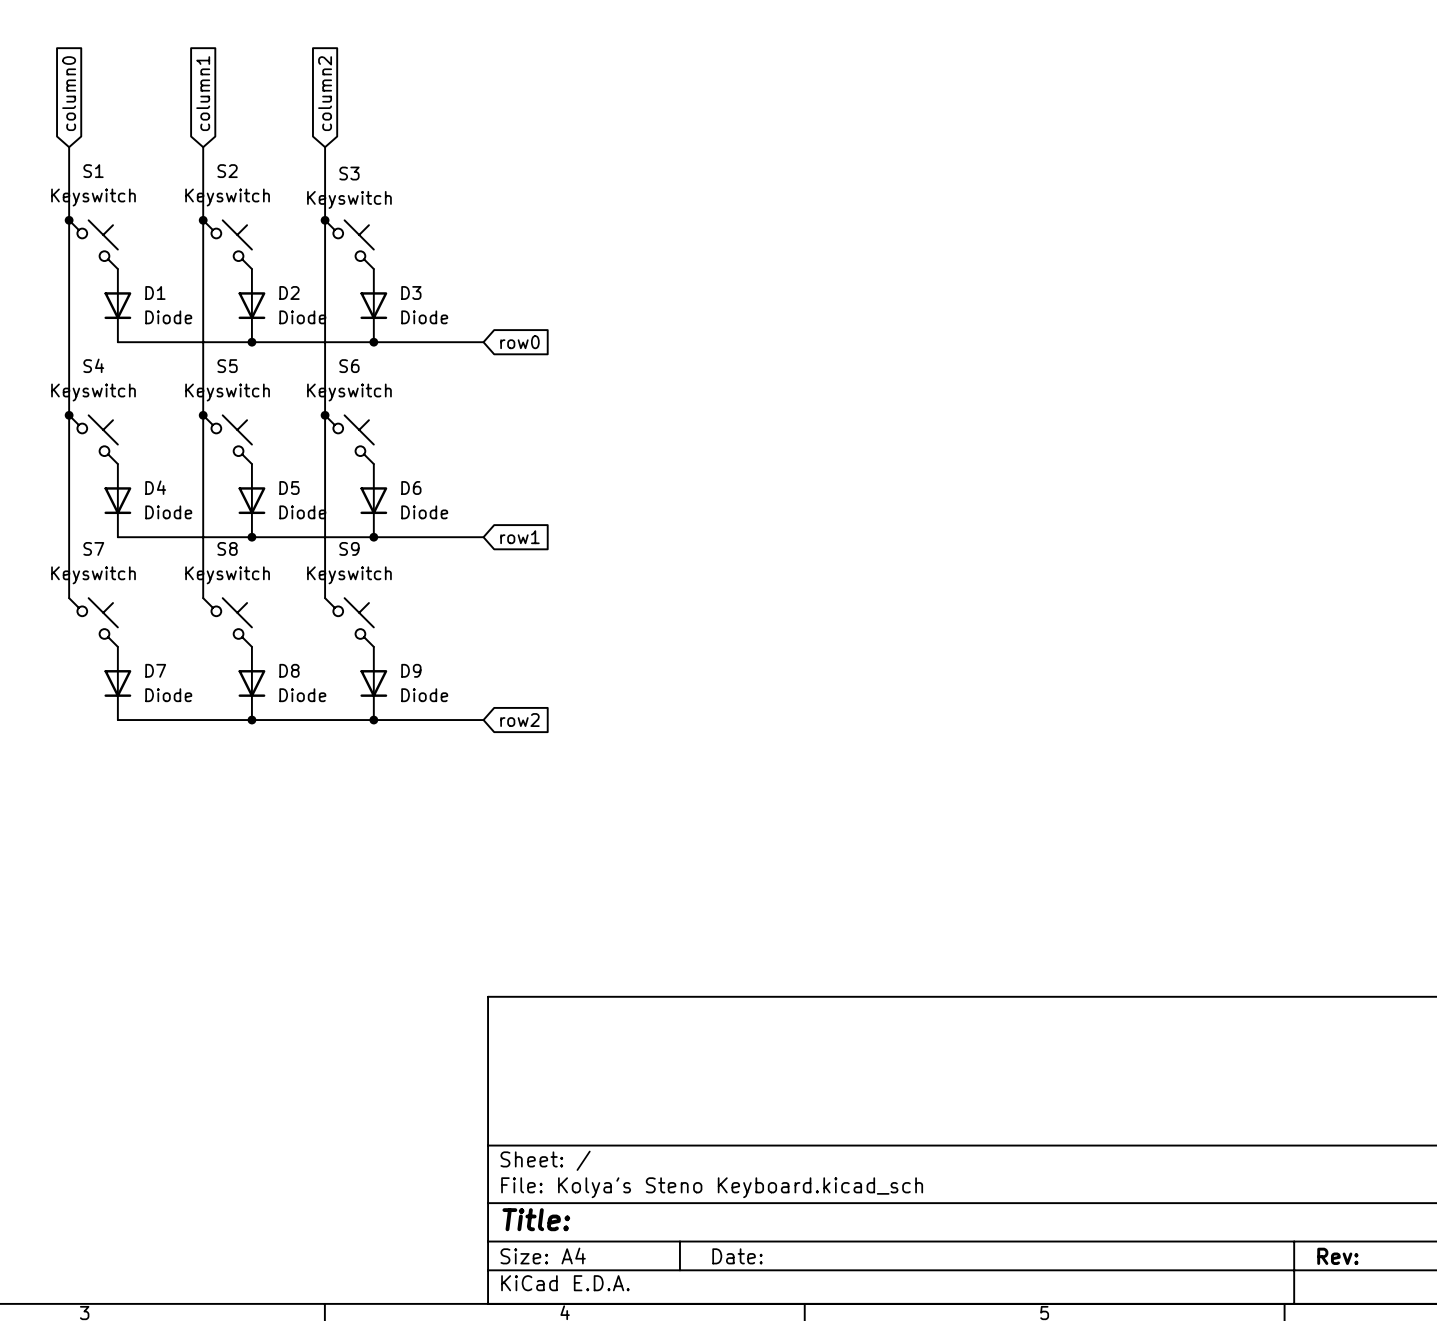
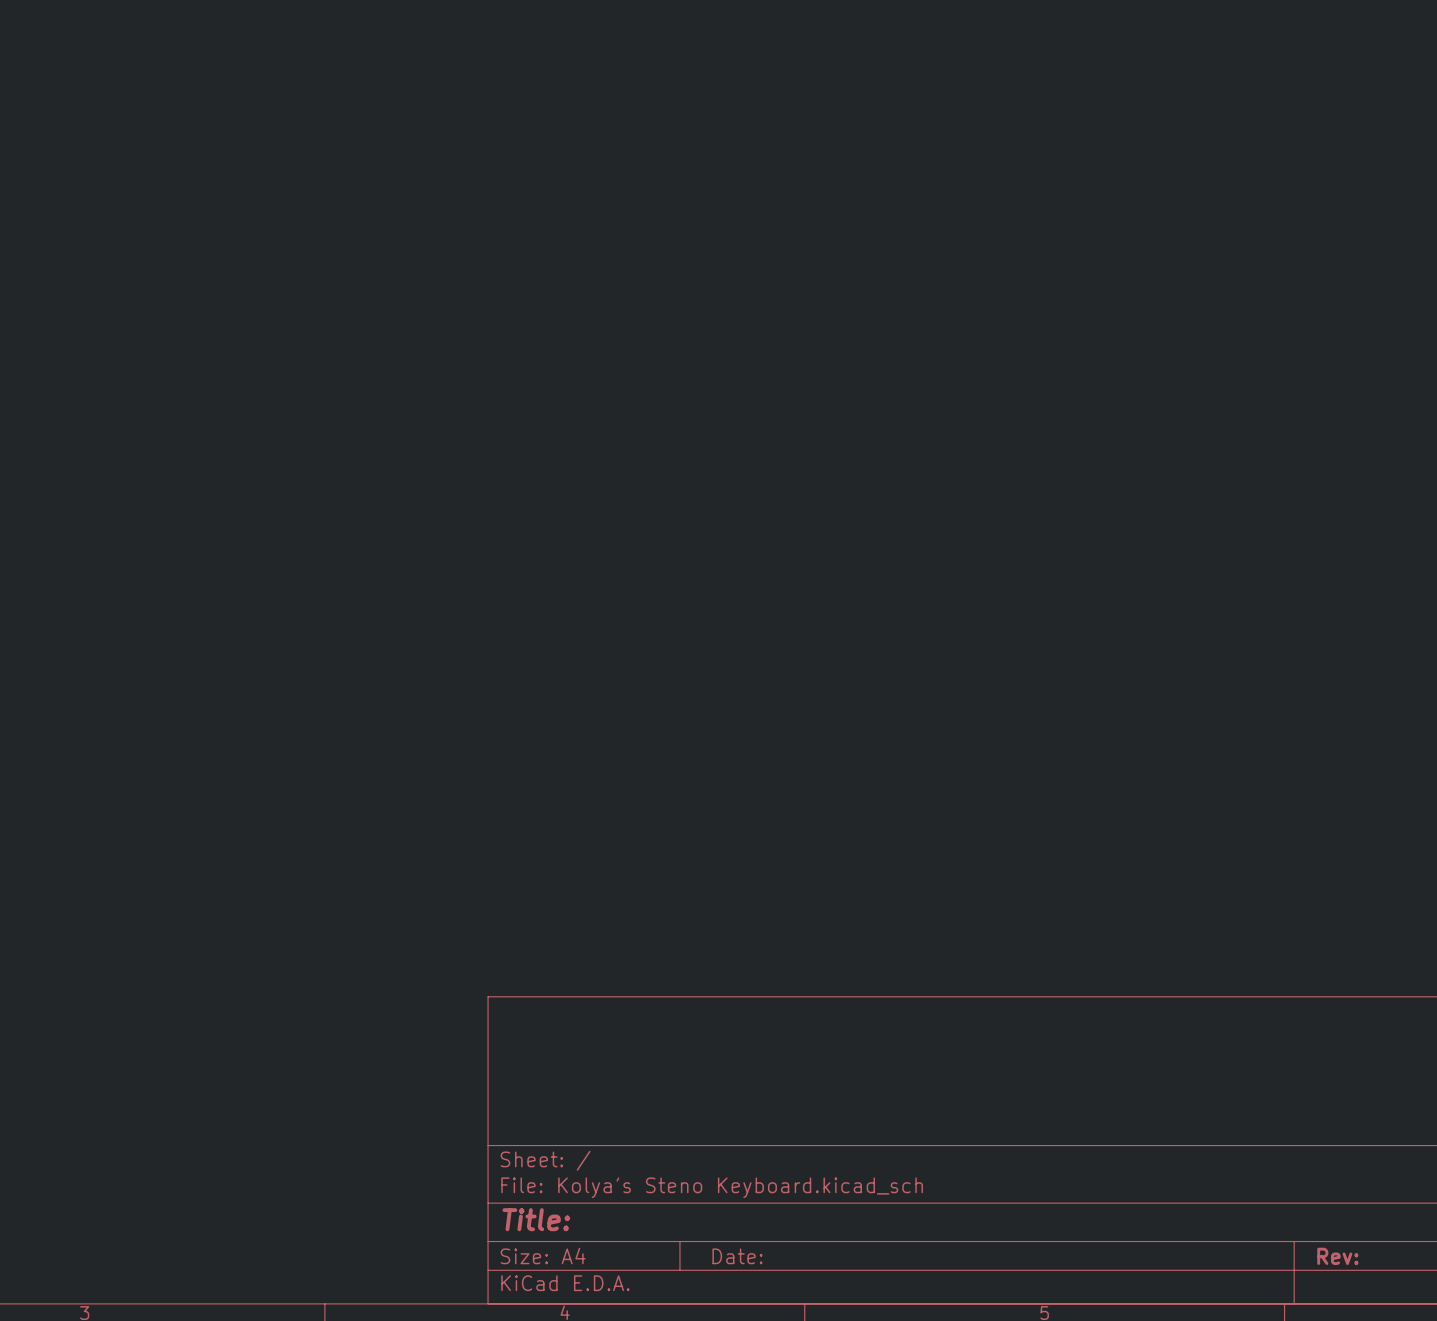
global label: column0 (69, 93) -> none
global label: column1 (203, 93) -> none
global label: column2 (325, 93) -> none
wire: (69, 147) (69, 598) -> none
wire: (203, 147) (203, 598) -> none
wire: (325, 147) (325, 598) -> none
junction: (69, 220) -> none
junction: (203, 220) -> none
junction: (325, 220) -> none
S1: Keyswitch (93, 244) -> none
S2: Keyswitch (227, 244) -> none
S3: Keyswitch (349, 244) -> none
D1: Diode (117, 305) -> none
D2: Diode (251, 305) -> none
D3: Diode (373, 305) -> none
wire: (117, 342) (483, 342) -> none
junction: (251, 342) -> none
junction: (373, 342) -> none
global label: row0 (519, 342) -> none
junction: (69, 415) -> none
junction: (203, 415) -> none
junction: (325, 415) -> none
S4: Keyswitch (93, 439) -> none
S5: Keyswitch (227, 439) -> none
S6: Keyswitch (349, 439) -> none
D4: Diode (117, 500) -> none
D5: Diode (251, 500) -> none
D6: Diode (373, 500) -> none
wire: (117, 537) (483, 537) -> none
junction: (251, 537) -> none
junction: (373, 537) -> none
global label: row1 (519, 537) -> none
S7: Keyswitch (93, 622) -> none
S8: Keyswitch (227, 622) -> none
S9: Keyswitch (349, 622) -> none
D7: Diode (117, 683) -> none
D8: Diode (251, 683) -> none
D9: Diode (373, 683) -> none
wire: (117, 720) (483, 720) -> none
junction: (251, 720) -> none
junction: (373, 720) -> none
global label: row2 (519, 720) -> none

